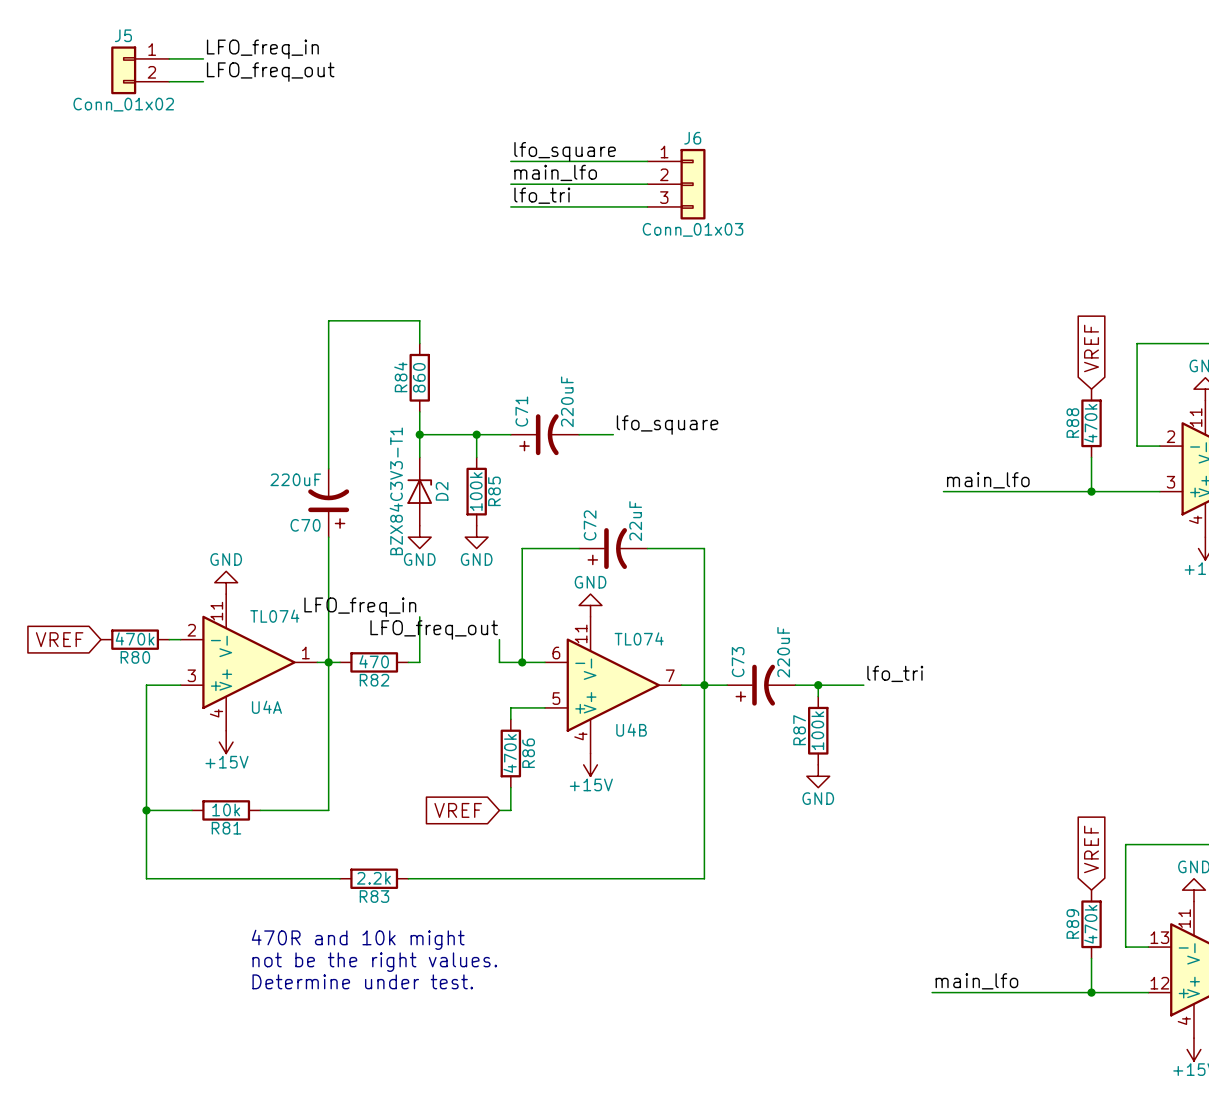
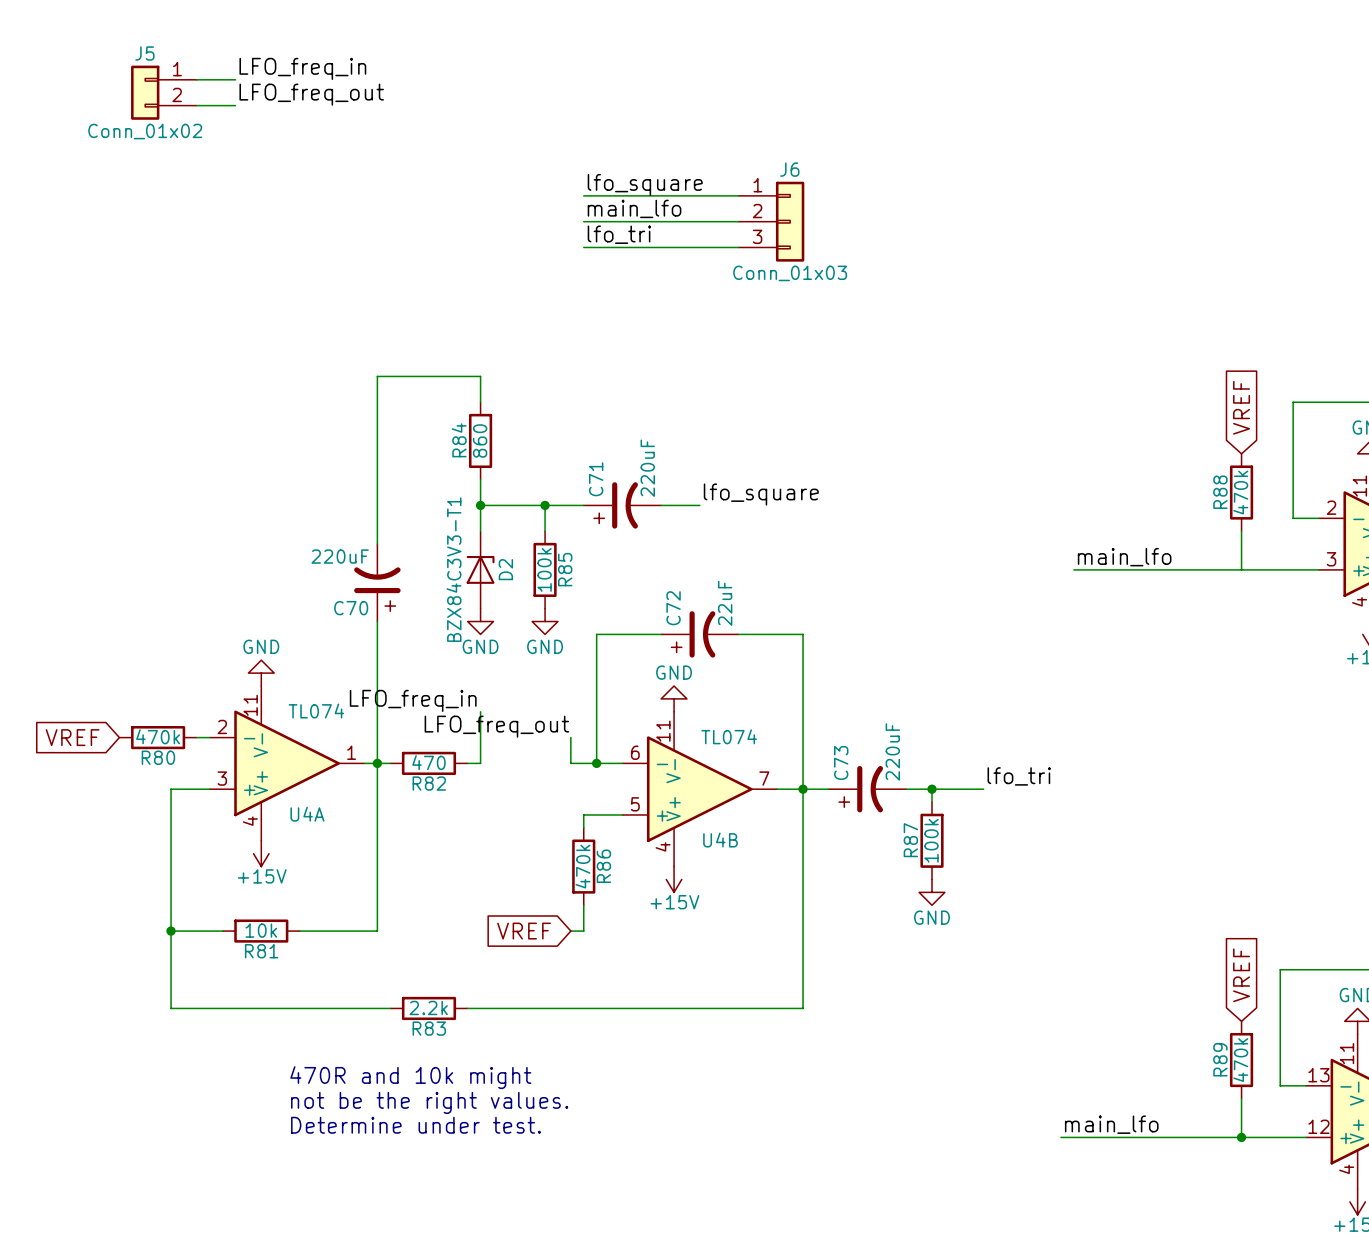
junction: (1091, 491) -> none

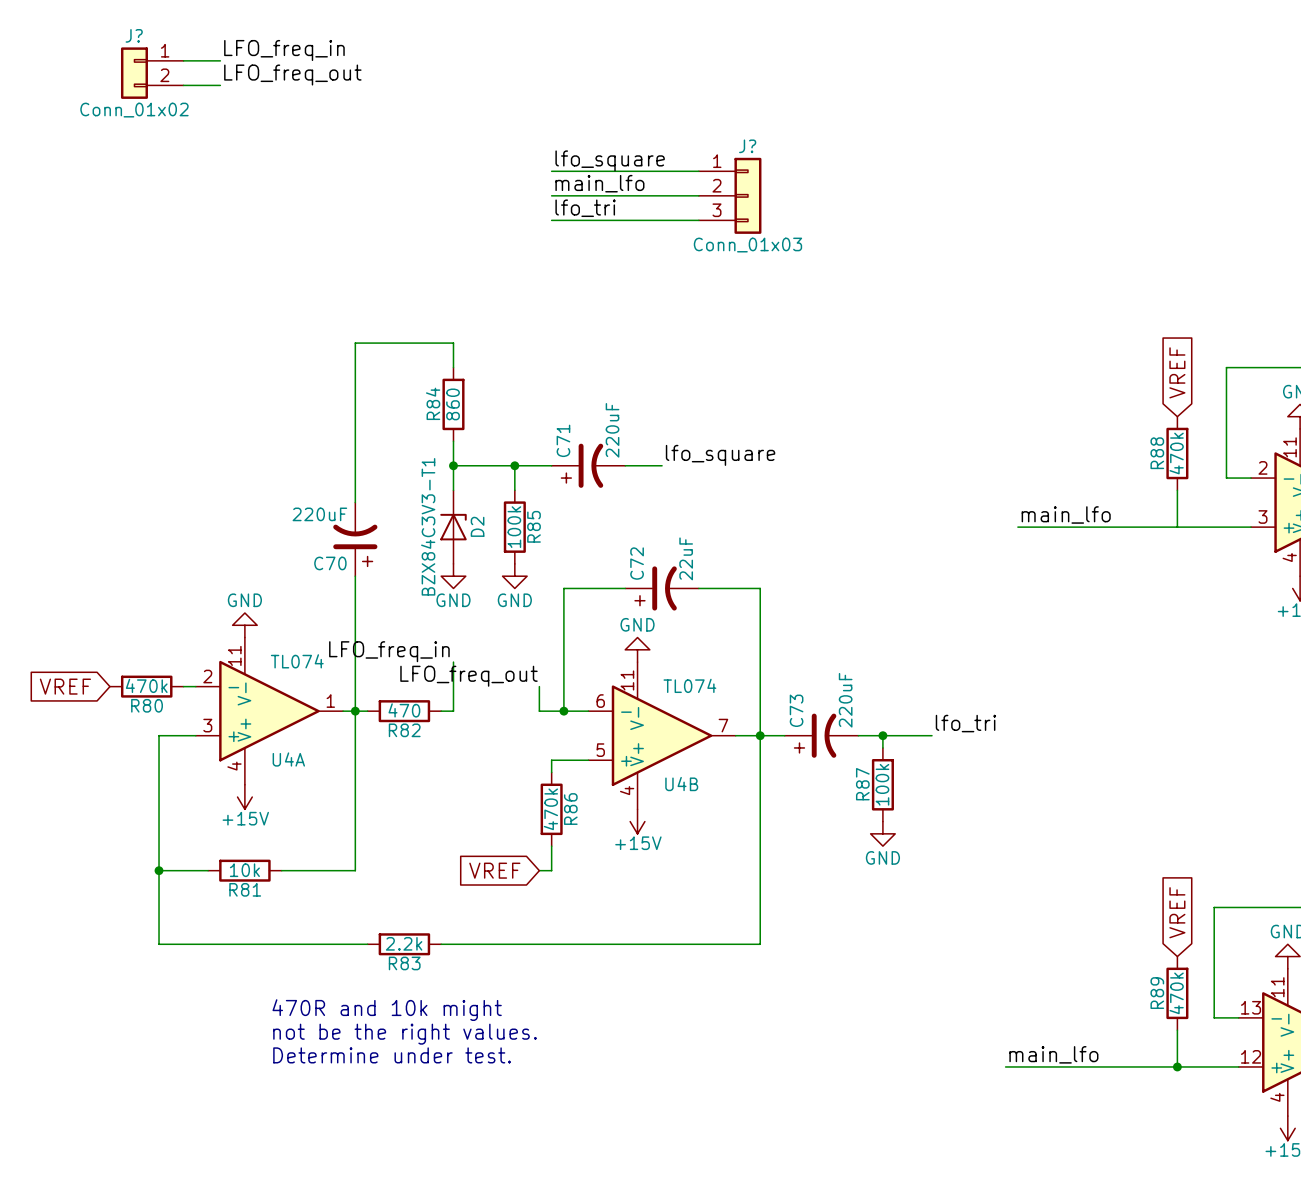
J5 name: J5 (144, 53) -> J? (134, 35)
J6 name: J6 (789, 169) -> J? (747, 146)

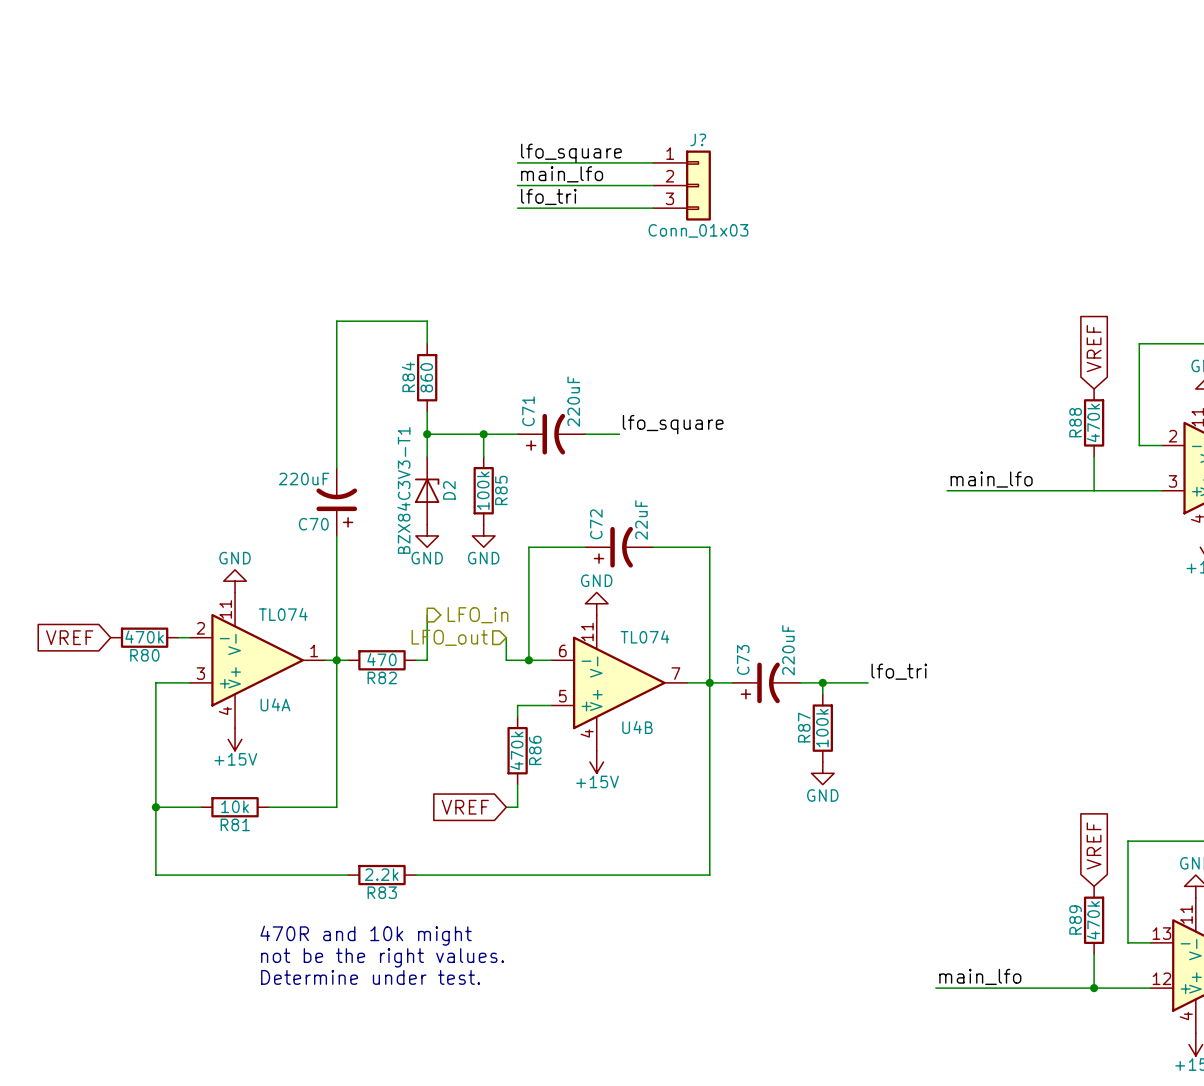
label: LFO_freq_in (284, 50) -> none
wire: (183, 60) (220, 60) -> none
J?: Conn_01x02 (152, 73) -> none
label: LFO_freq_out (292, 75) -> none
wire: (183, 85) (220, 85) -> none
label: LFO_freq_in (389, 651) -> none
hierarchical label: none -> LFO_in (477, 615)
label: LFO_freq_out (468, 676) -> none
hierarchical label: none -> LFO_out (449, 637)

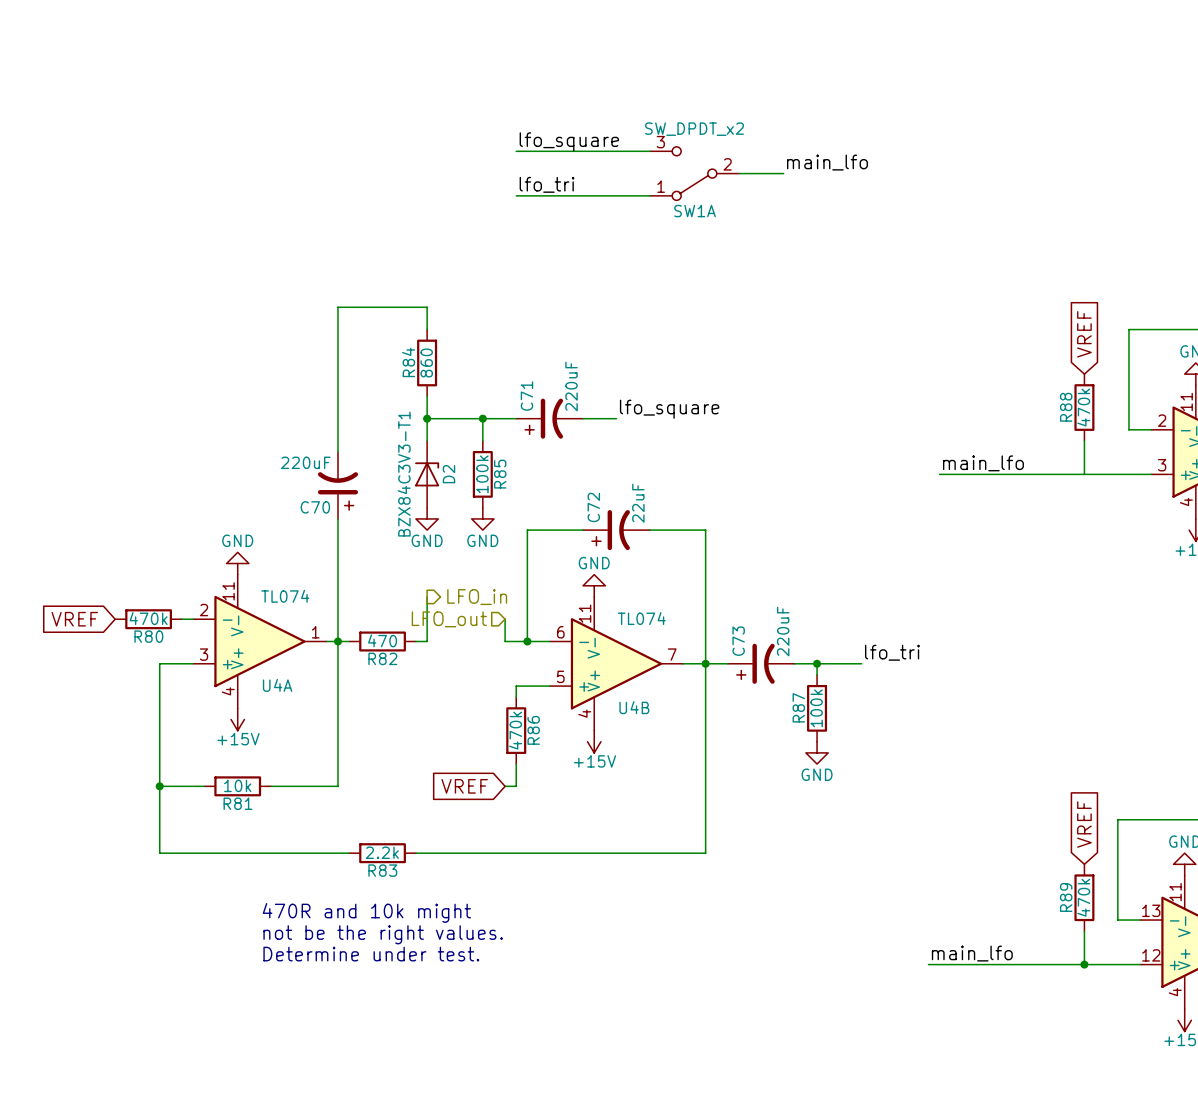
label: main_lfo (562, 174) -> none
label: none -> main_lfo (827, 162)
wire: (517, 185) (653, 185) -> none
J?: Conn_01x03 (682, 185) -> none
SW1A: none -> SW_DPDT_x2 (694, 173)
wire: none -> (739, 173) (783, 173)

